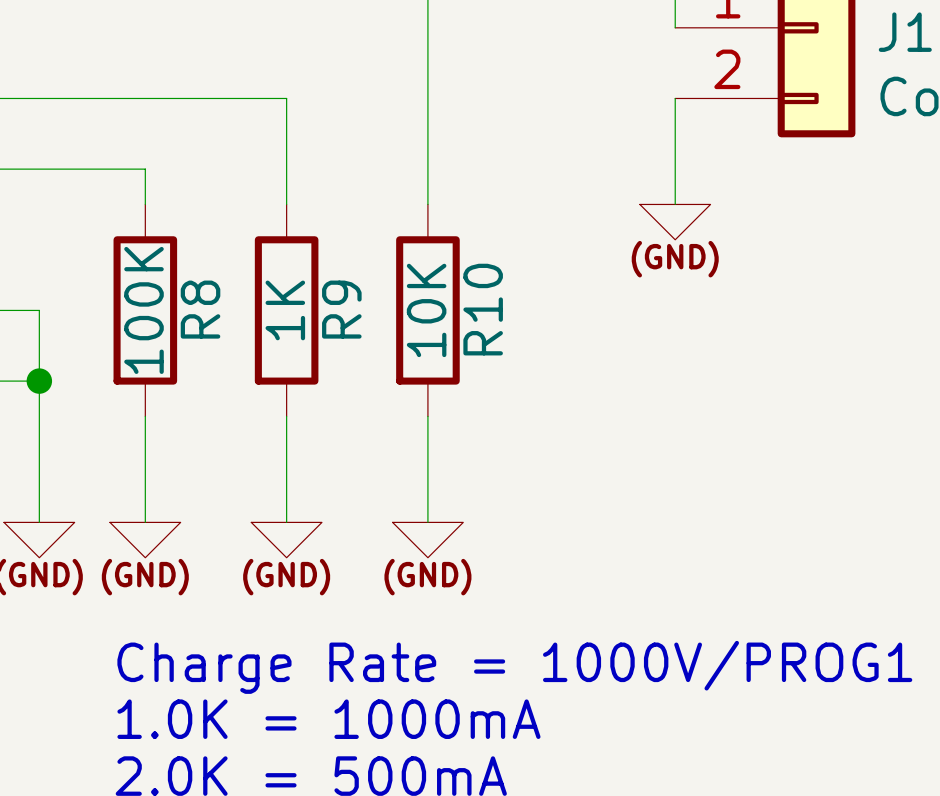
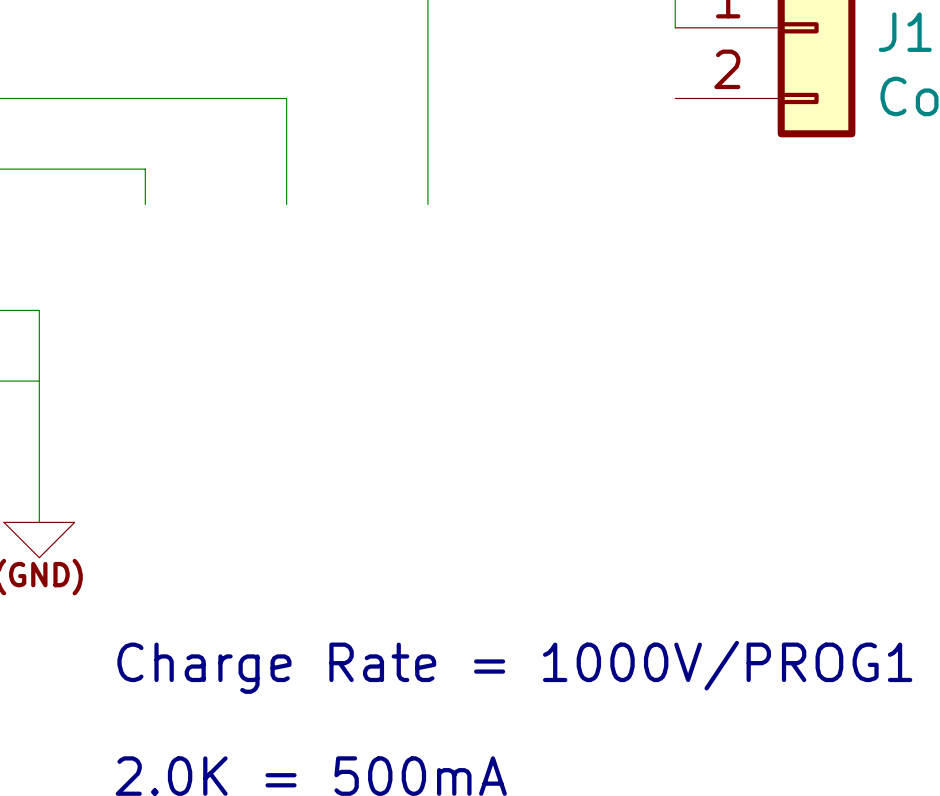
wire: (675, 98) (675, 204) -> none
power symbol: (675, 222) -> none
R8: 100K (145, 310) -> none
R9: 1K (286, 310) -> none
R10: 10K (427, 310) -> none
junction: (39, 381) -> none
wire: (145, 416) (145, 522) -> none
wire: (286, 416) (286, 522) -> none
wire: (427, 416) (427, 522) -> none
power symbol: (145, 540) -> none
power symbol: (286, 540) -> none
power symbol: (427, 540) -> none
text: 1.0K = 1000mA (328, 719) -> none

